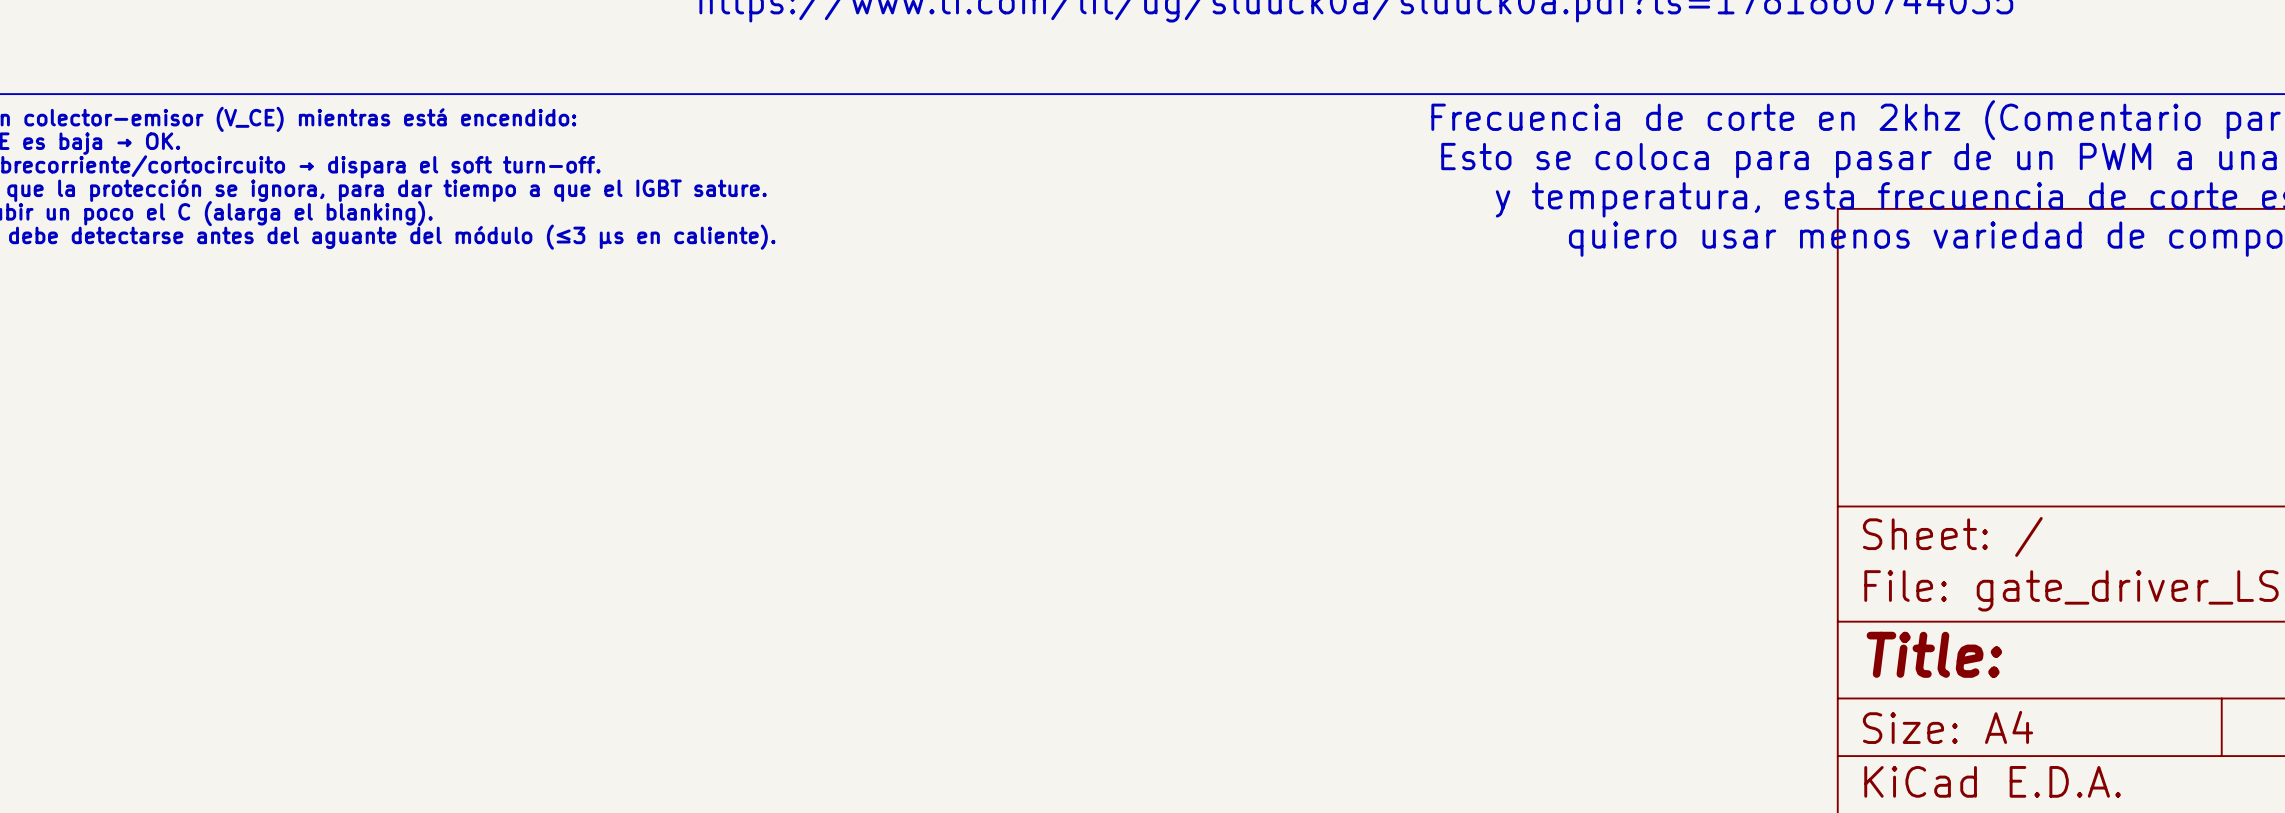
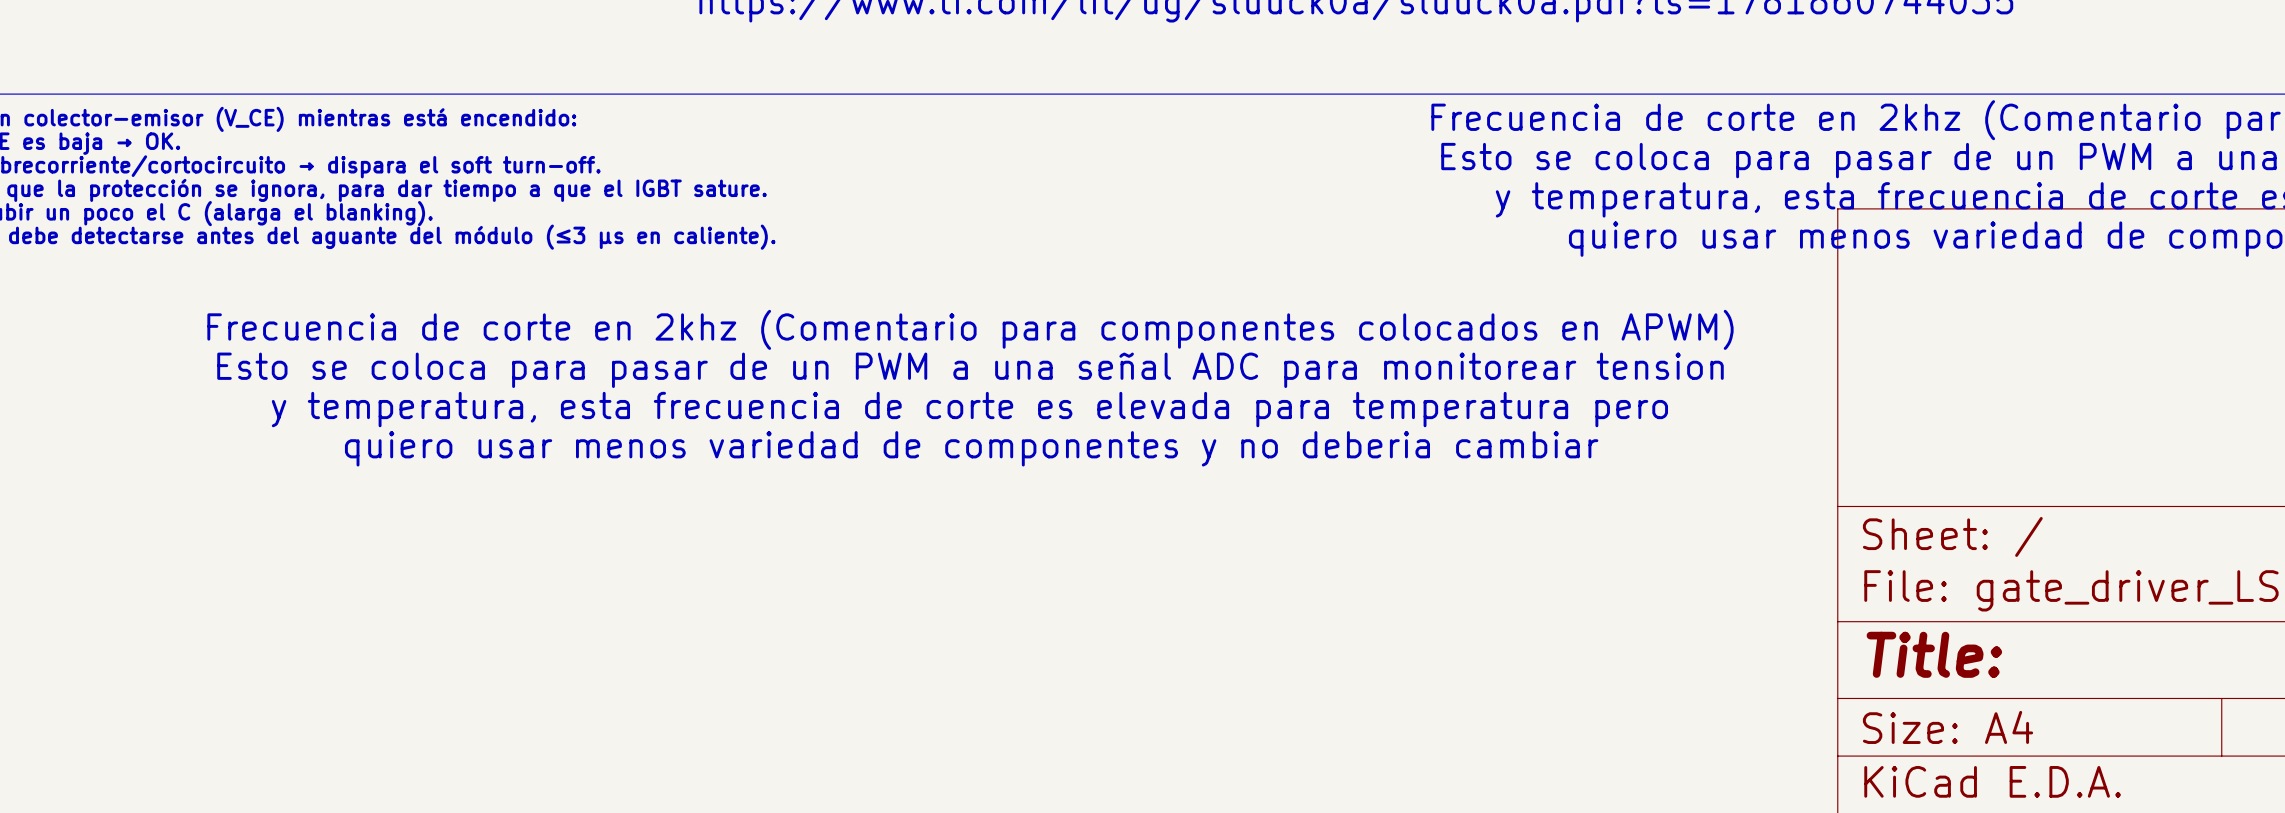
text: none -> Frecuencia de corte en 2khz (Comentario para componentes colocados en APWM) (970, 329)
text: none -> Esto se coloca para pasar de un PWM a una señal ADC para monitorear tension (970, 370)
text: none -> y temperatura, esta frecuencia de corte es elevada para temperatura pero (969, 409)
text: none -> quiero usar menos variedad de componentes y no deberia cambiar (971, 448)

